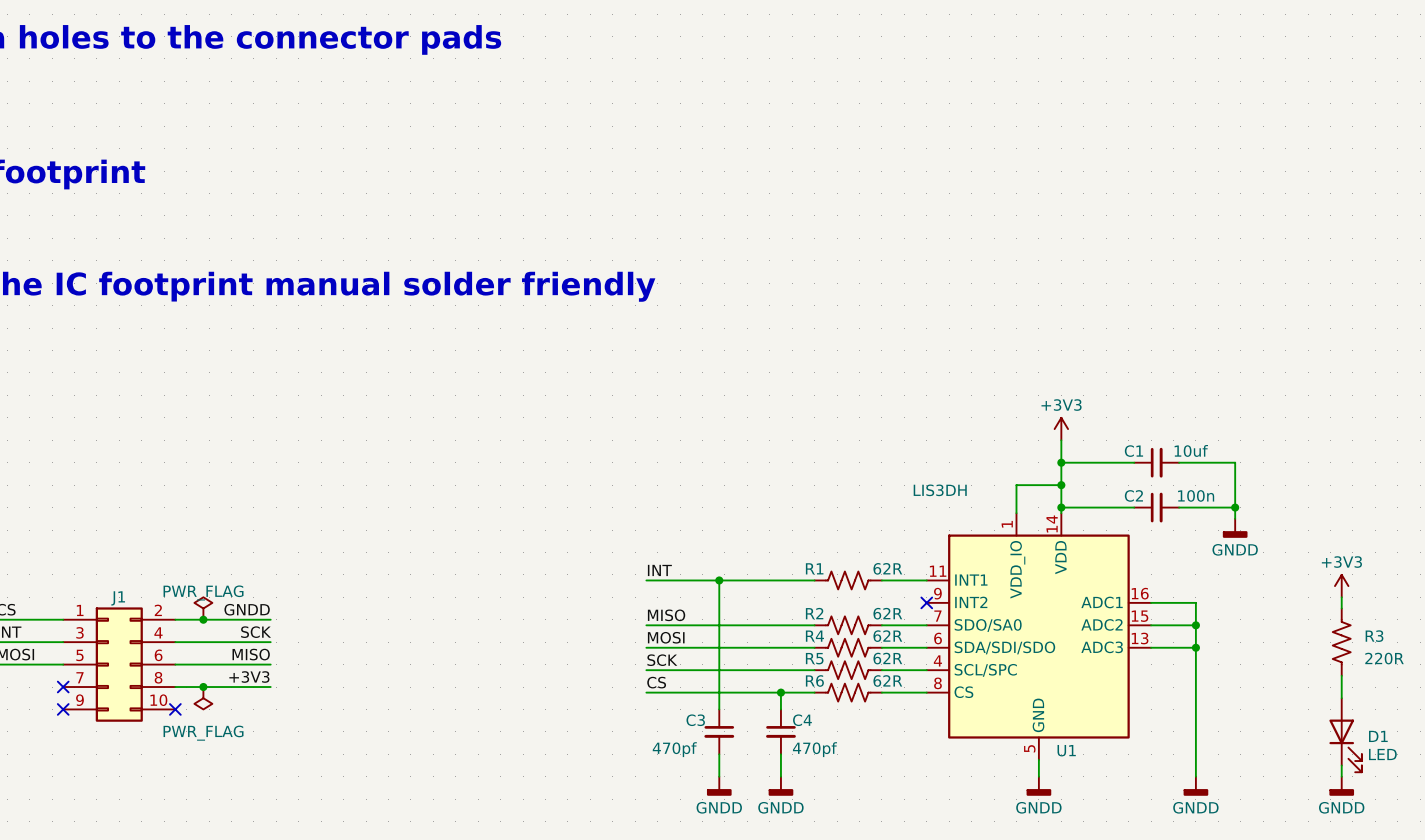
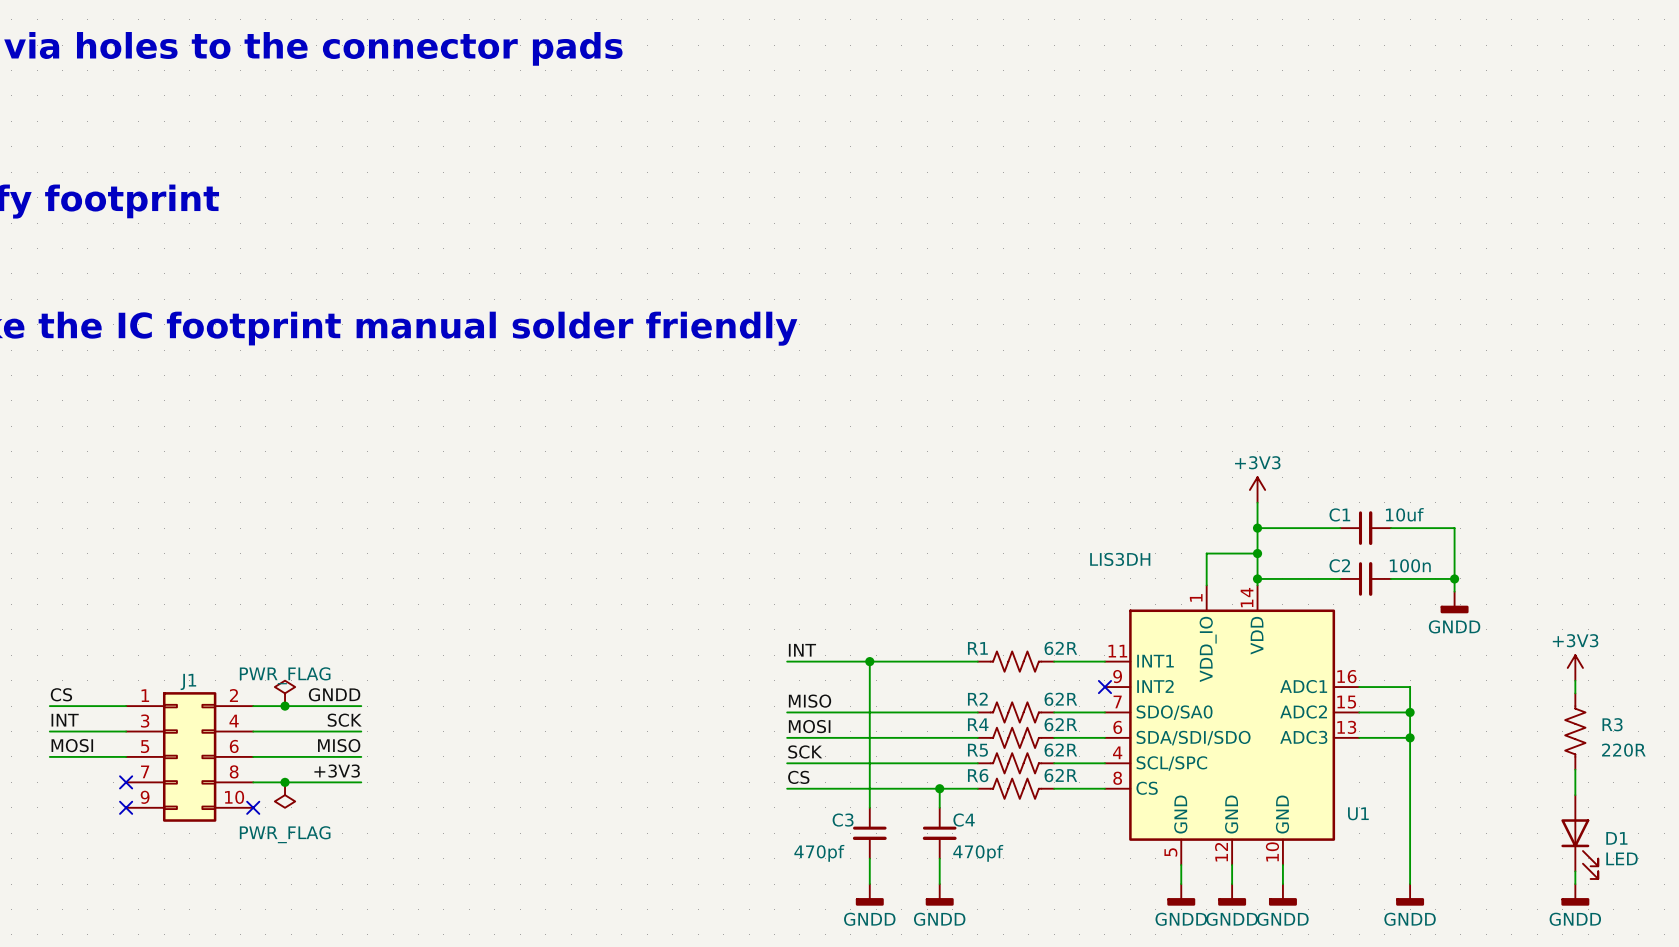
U1 symbol: [926, 513, 1152, 760] -> [1104, 585, 1360, 866]
U1 name position: U1 (1066, 750) -> U1 (1358, 813)
wire: none -> (1181, 865) (1181, 884)
wire: none -> (1282, 865) (1282, 884)
power symbol: none -> GNDD (1181, 894)
power symbol: none -> GNDD (1282, 894)

